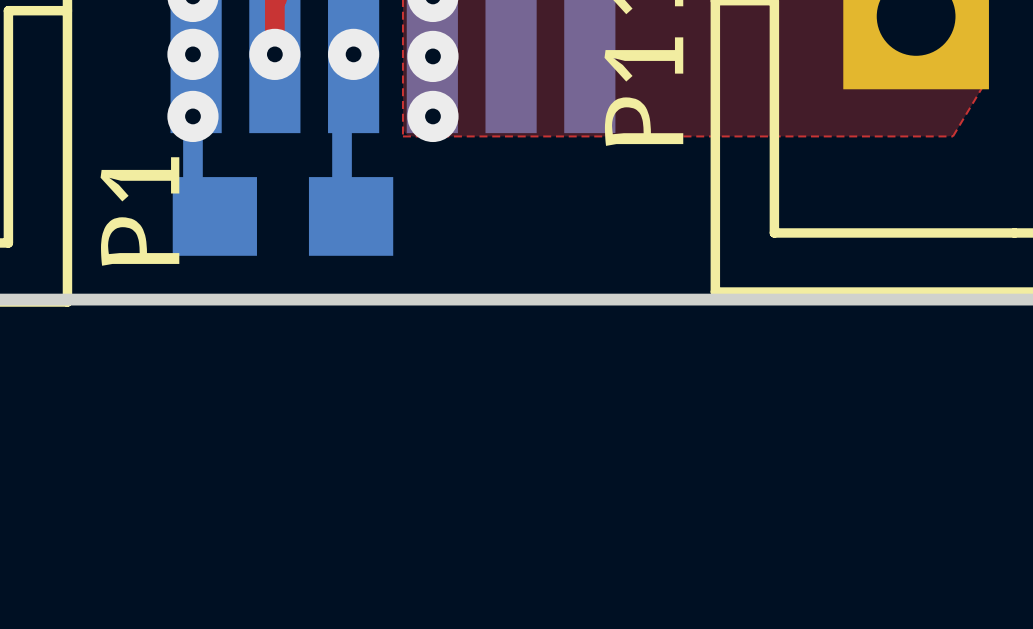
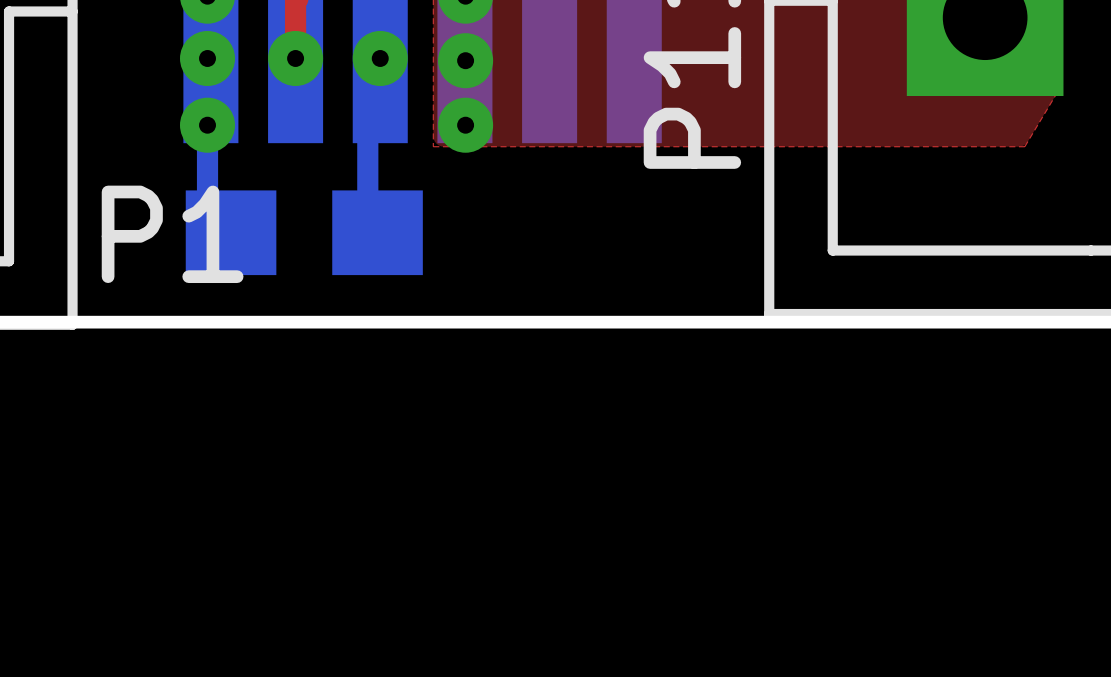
P1 name rotation: 0° (139, 211) -> 90° clockwise (172, 234)

